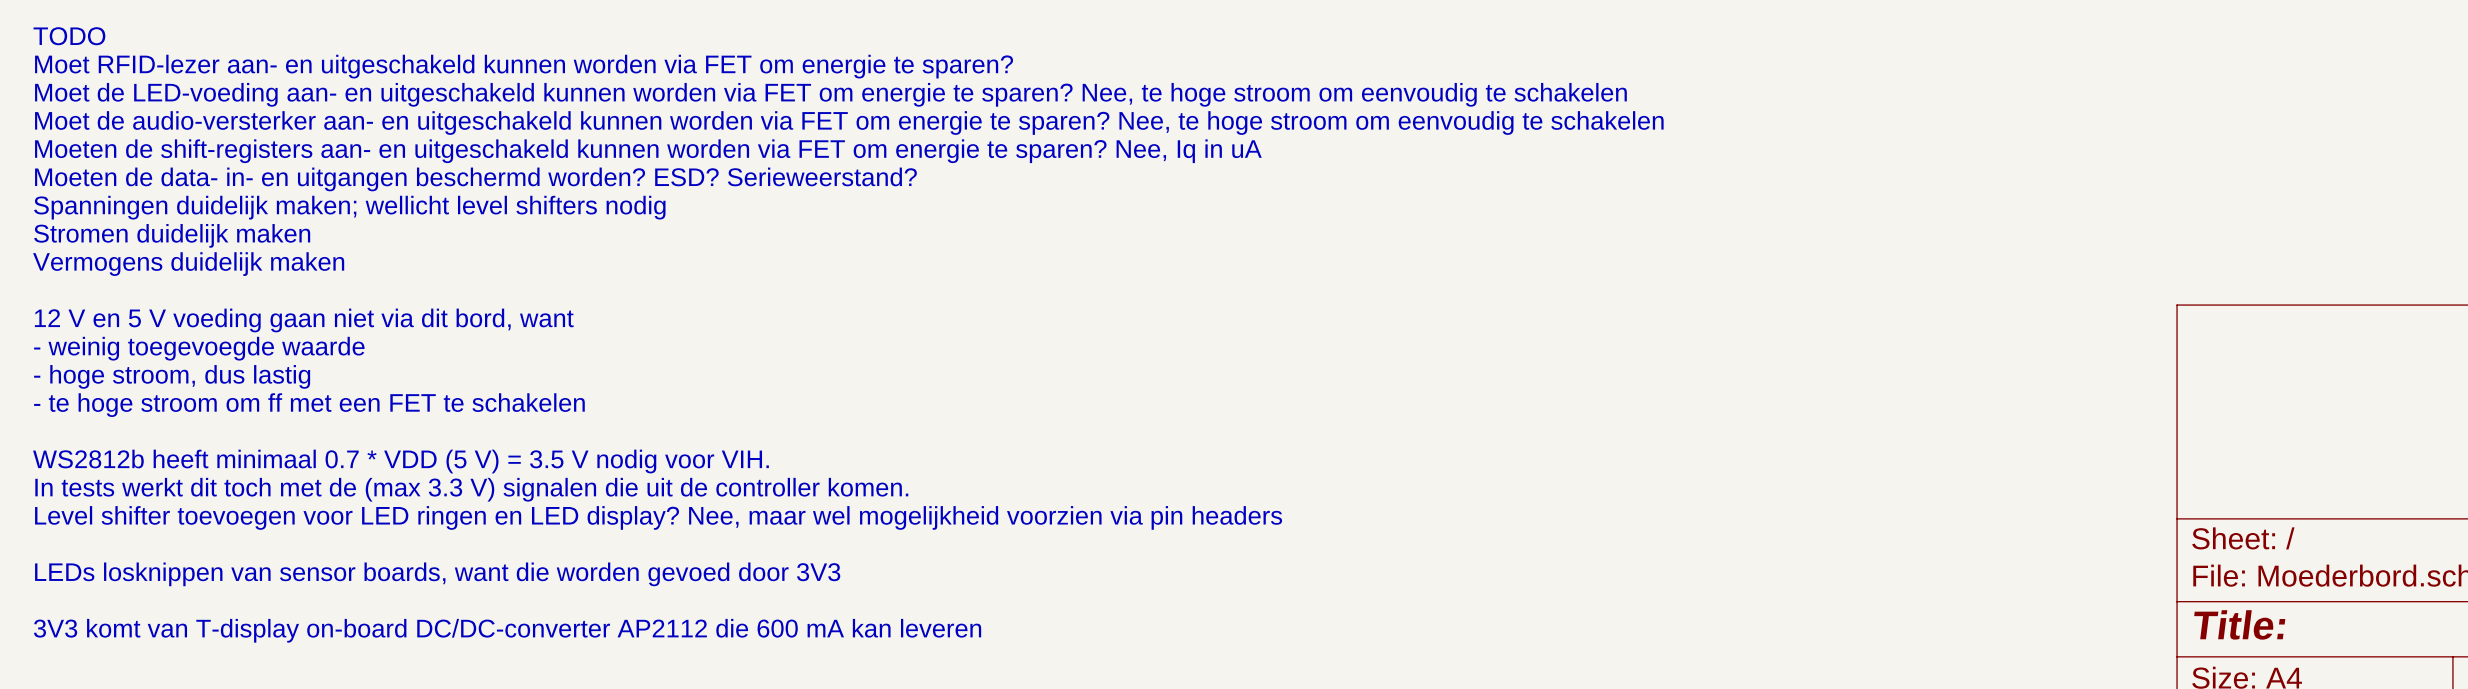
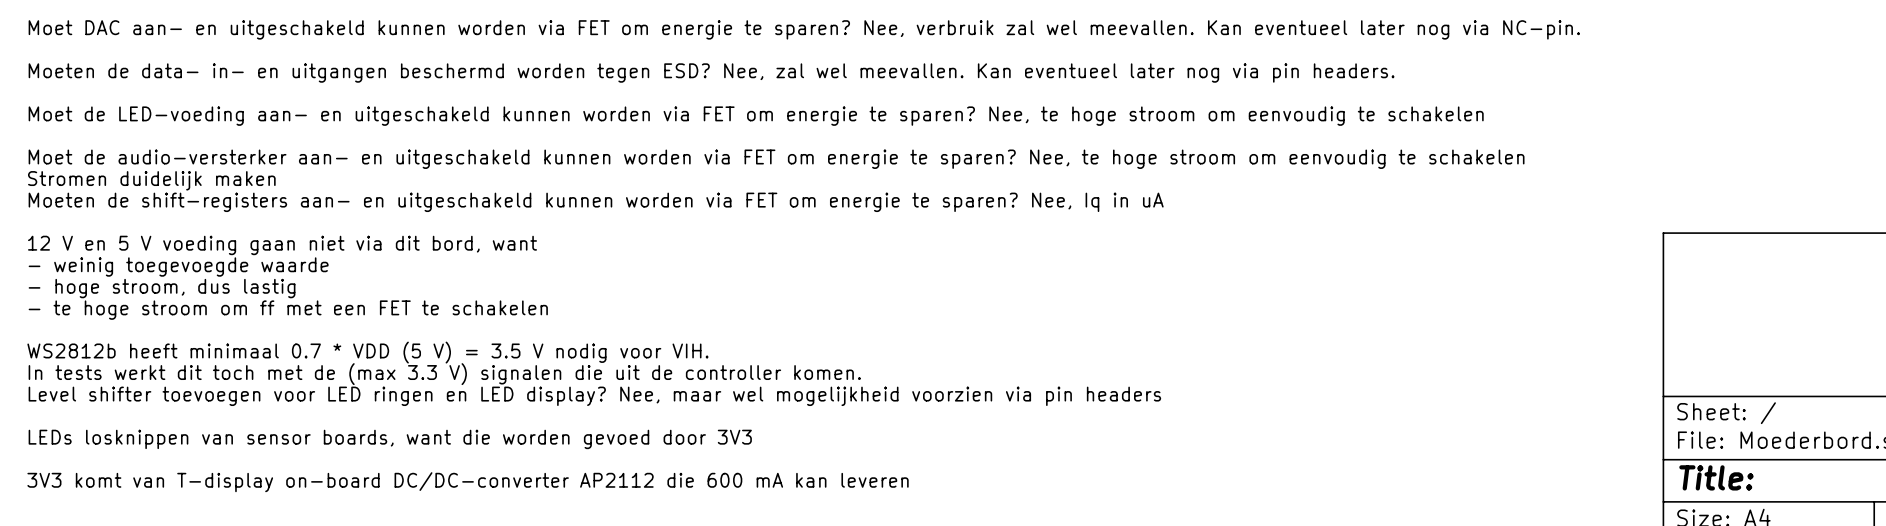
text: TODO (69, 36) -> Moet DAC aan- en uitgeschakeld kunnen worden via FET om energie te sparen? Nee, verbruik zal wel meevallen. Kan eventueel later nog via NC-pin. (804, 29)
text: Moet RFID-lezer aan- en uitgeschakeld kunnen worden via FET om energie te sparen? (524, 66) -> none
text: Moet de LED-voeding aan- en uitgeschakeld kunnen worden via FET om energie te sparen? Nee, te hoge stroom om eenvoudig te schakelen (830, 94) -> Moeten de data- in- en uitgangen beschermd worden tegen ESD? Nee, zal wel meevallen. Kan eventueel later nog via pin headers. (711, 73)
text: Moet de audio-versterker aan- en uitgeschakeld kunnen worden via FET om energie te sparen? Nee, te hoge stroom om eenvoudig te schakelen (849, 123) -> none
text: Moeten de shift-registers aan- en uitgeschakeld kunnen worden via FET om energie te sparen? Nee, Iq in uA (648, 151) -> Moet de LED-voeding aan- en uitgeschakeld kunnen worden via FET om energie te sparen? Nee, te hoge stroom om eenvoudig te schakelen (756, 116)
text: Moeten de data- in- en uitgangen beschermd worden? ESD? Serieweerstand? (475, 179) -> none
text: Spanningen duidelijk maken; wellicht level shifters nodig (349, 207) -> Moet de audio-versterker aan- en uitgeschakeld kunnen worden via FET om energie te sparen? Nee, te hoge stroom om eenvoudig te schakelen (776, 159)
text: Vermogens duidelijk maken (188, 264) -> Moeten de shift-registers aan- en uitgeschakeld kunnen worden via FET om energie te sparen? Nee, Iq in uA (596, 202)

